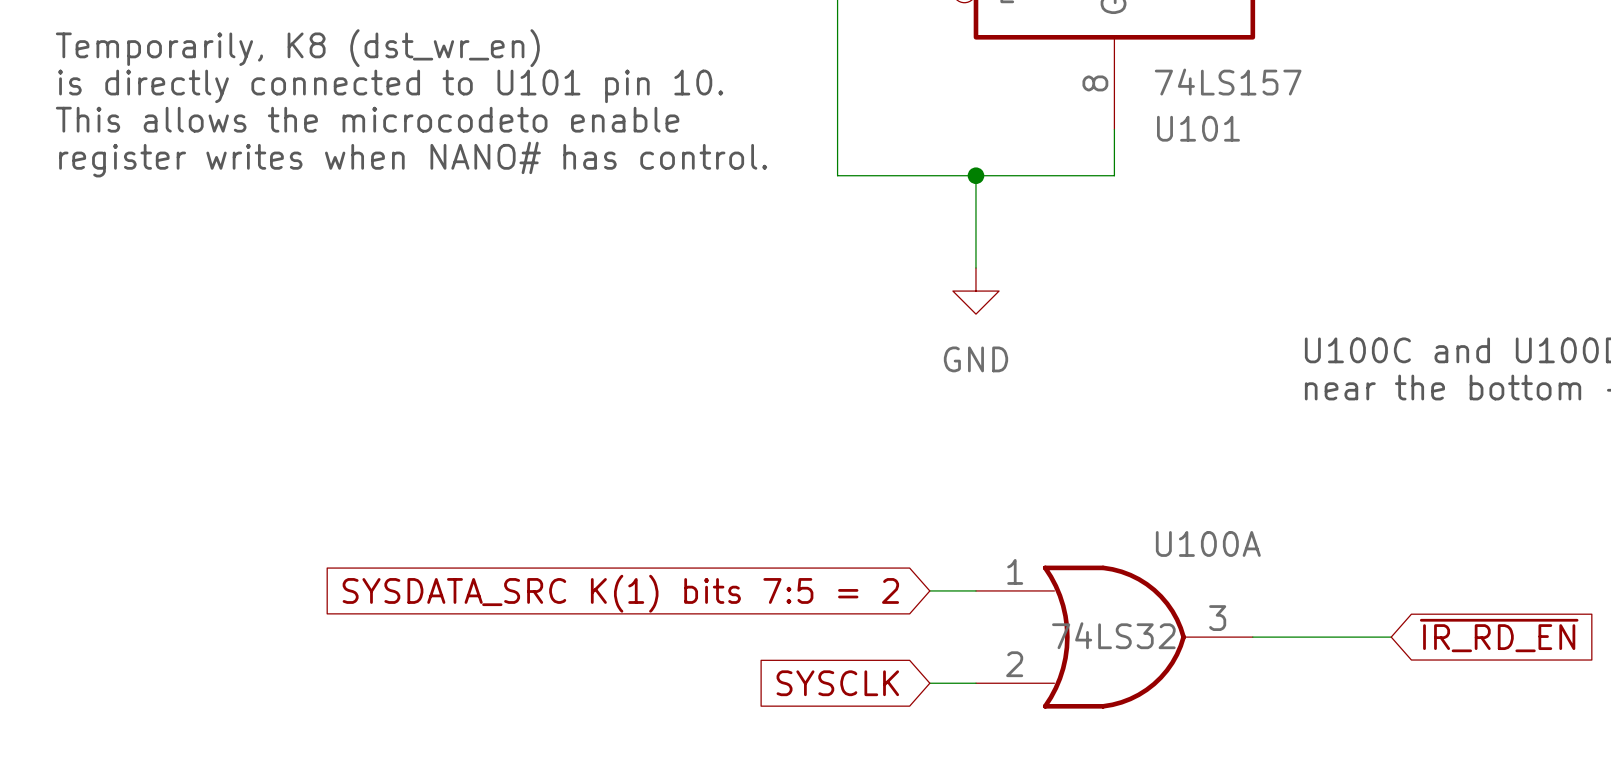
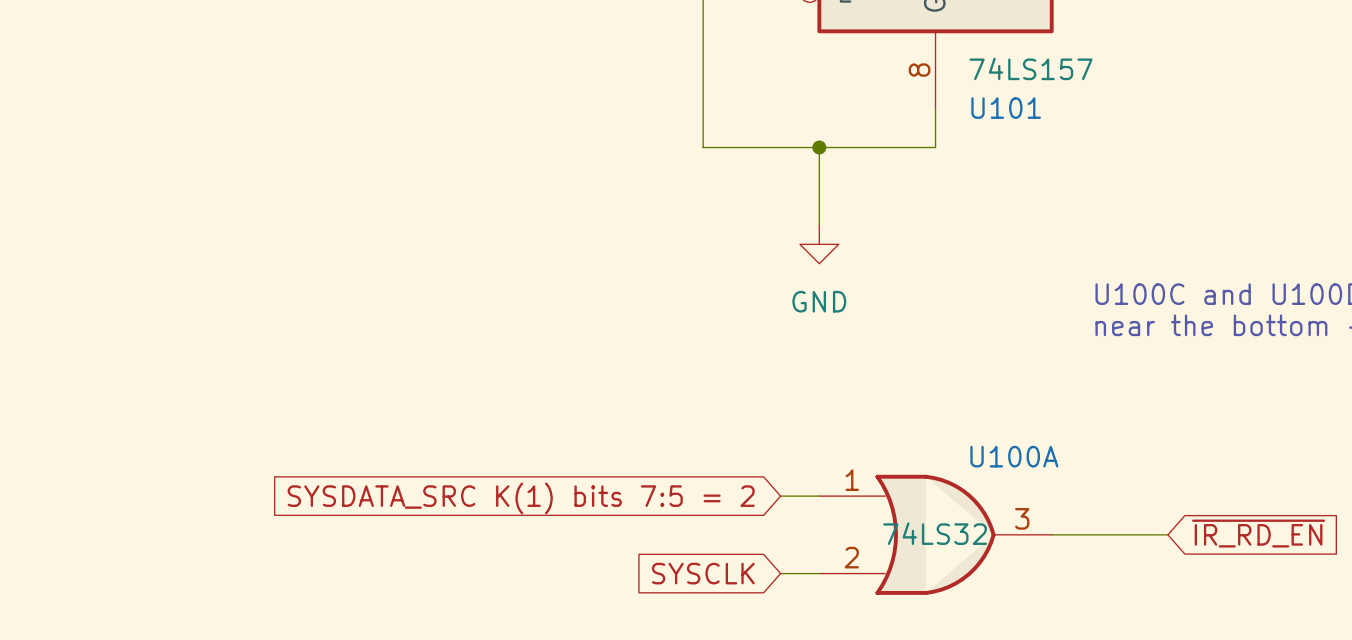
text: Temporarily, K8 (dst_wr_en) (297, 48) -> none
text: is directly connected to U101 pin 10. (390, 86) -> none
text: This allows the microcodeto enable (367, 119) -> none
text: register writes when NANO# has control. (413, 159) -> none

